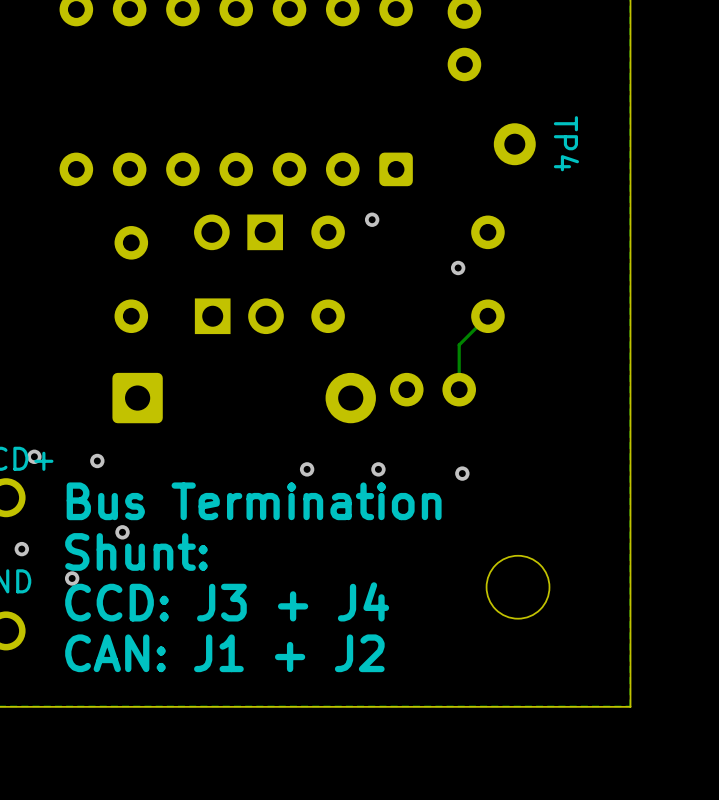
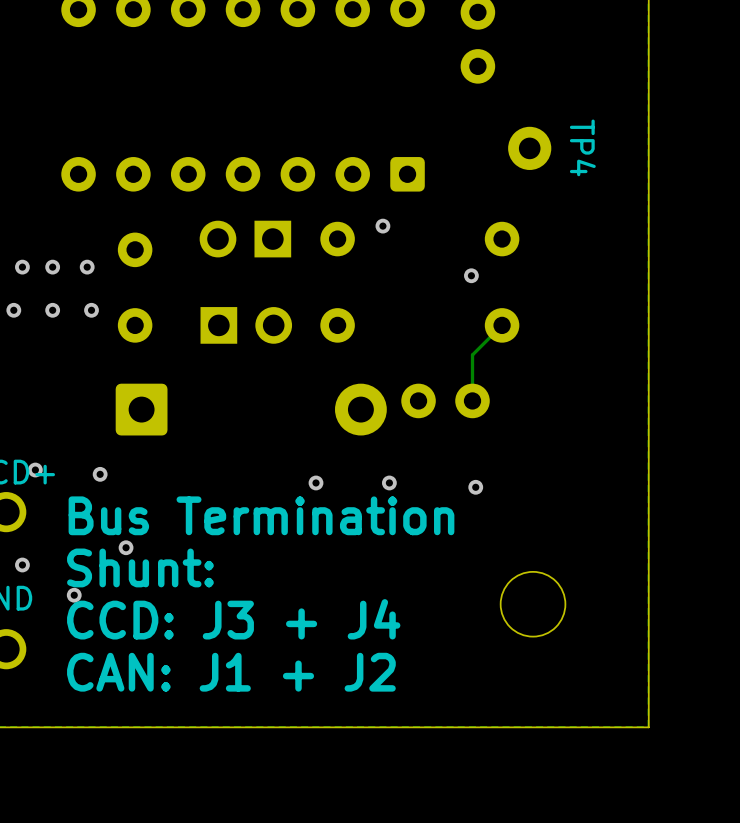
via: none -> (22, 267)
via: none -> (52, 267)
via: none -> (87, 267)
via: none -> (13, 310)
via: none -> (52, 310)
via: none -> (91, 310)

